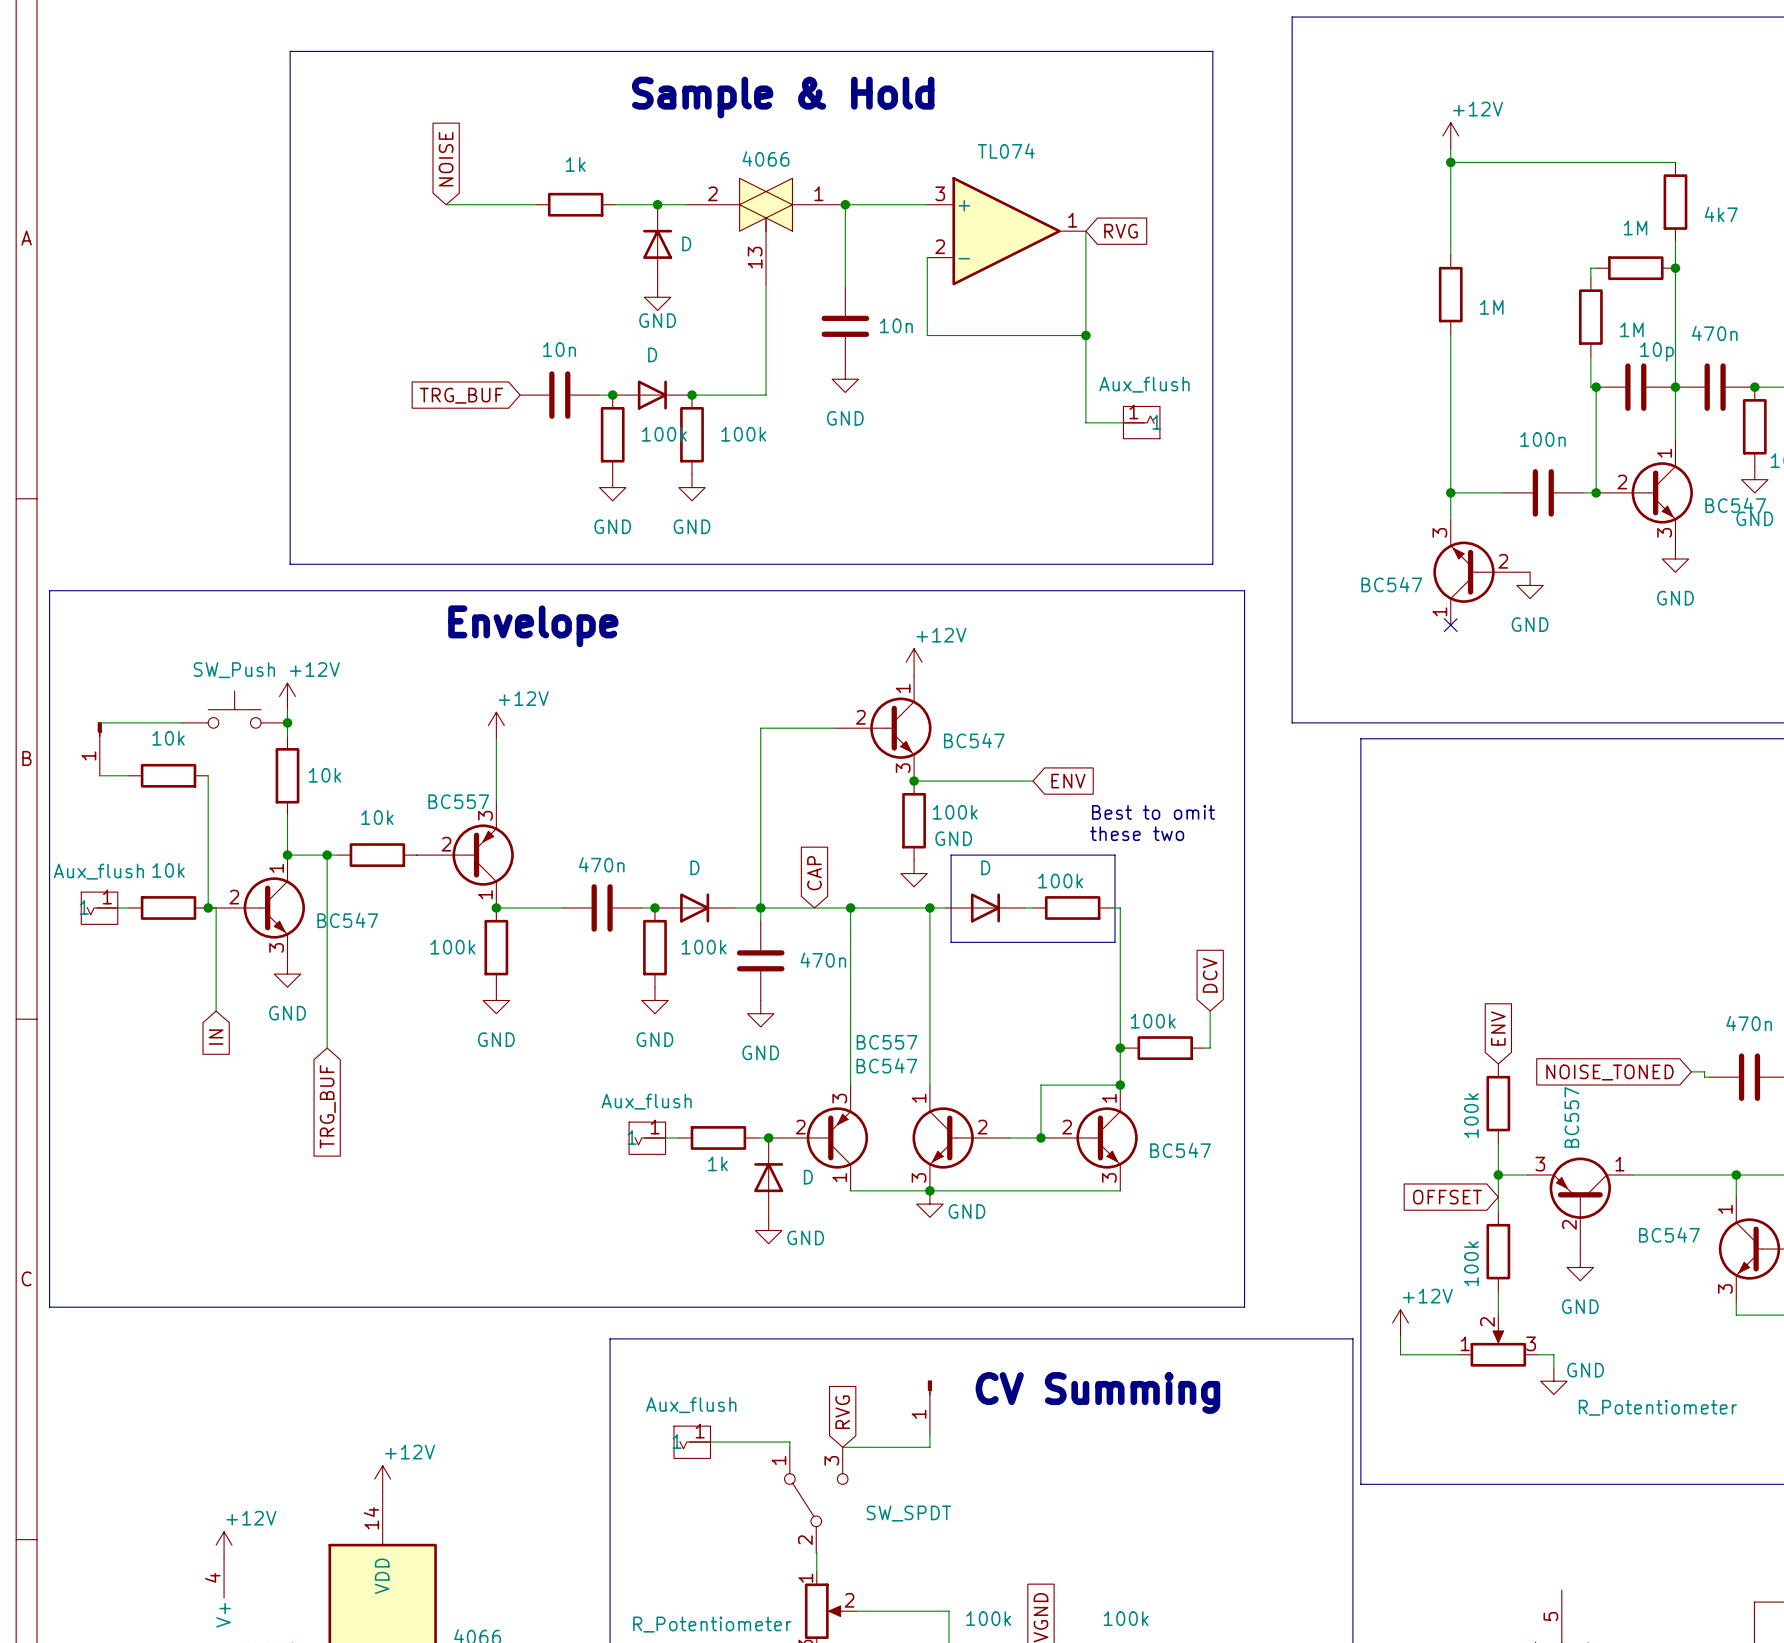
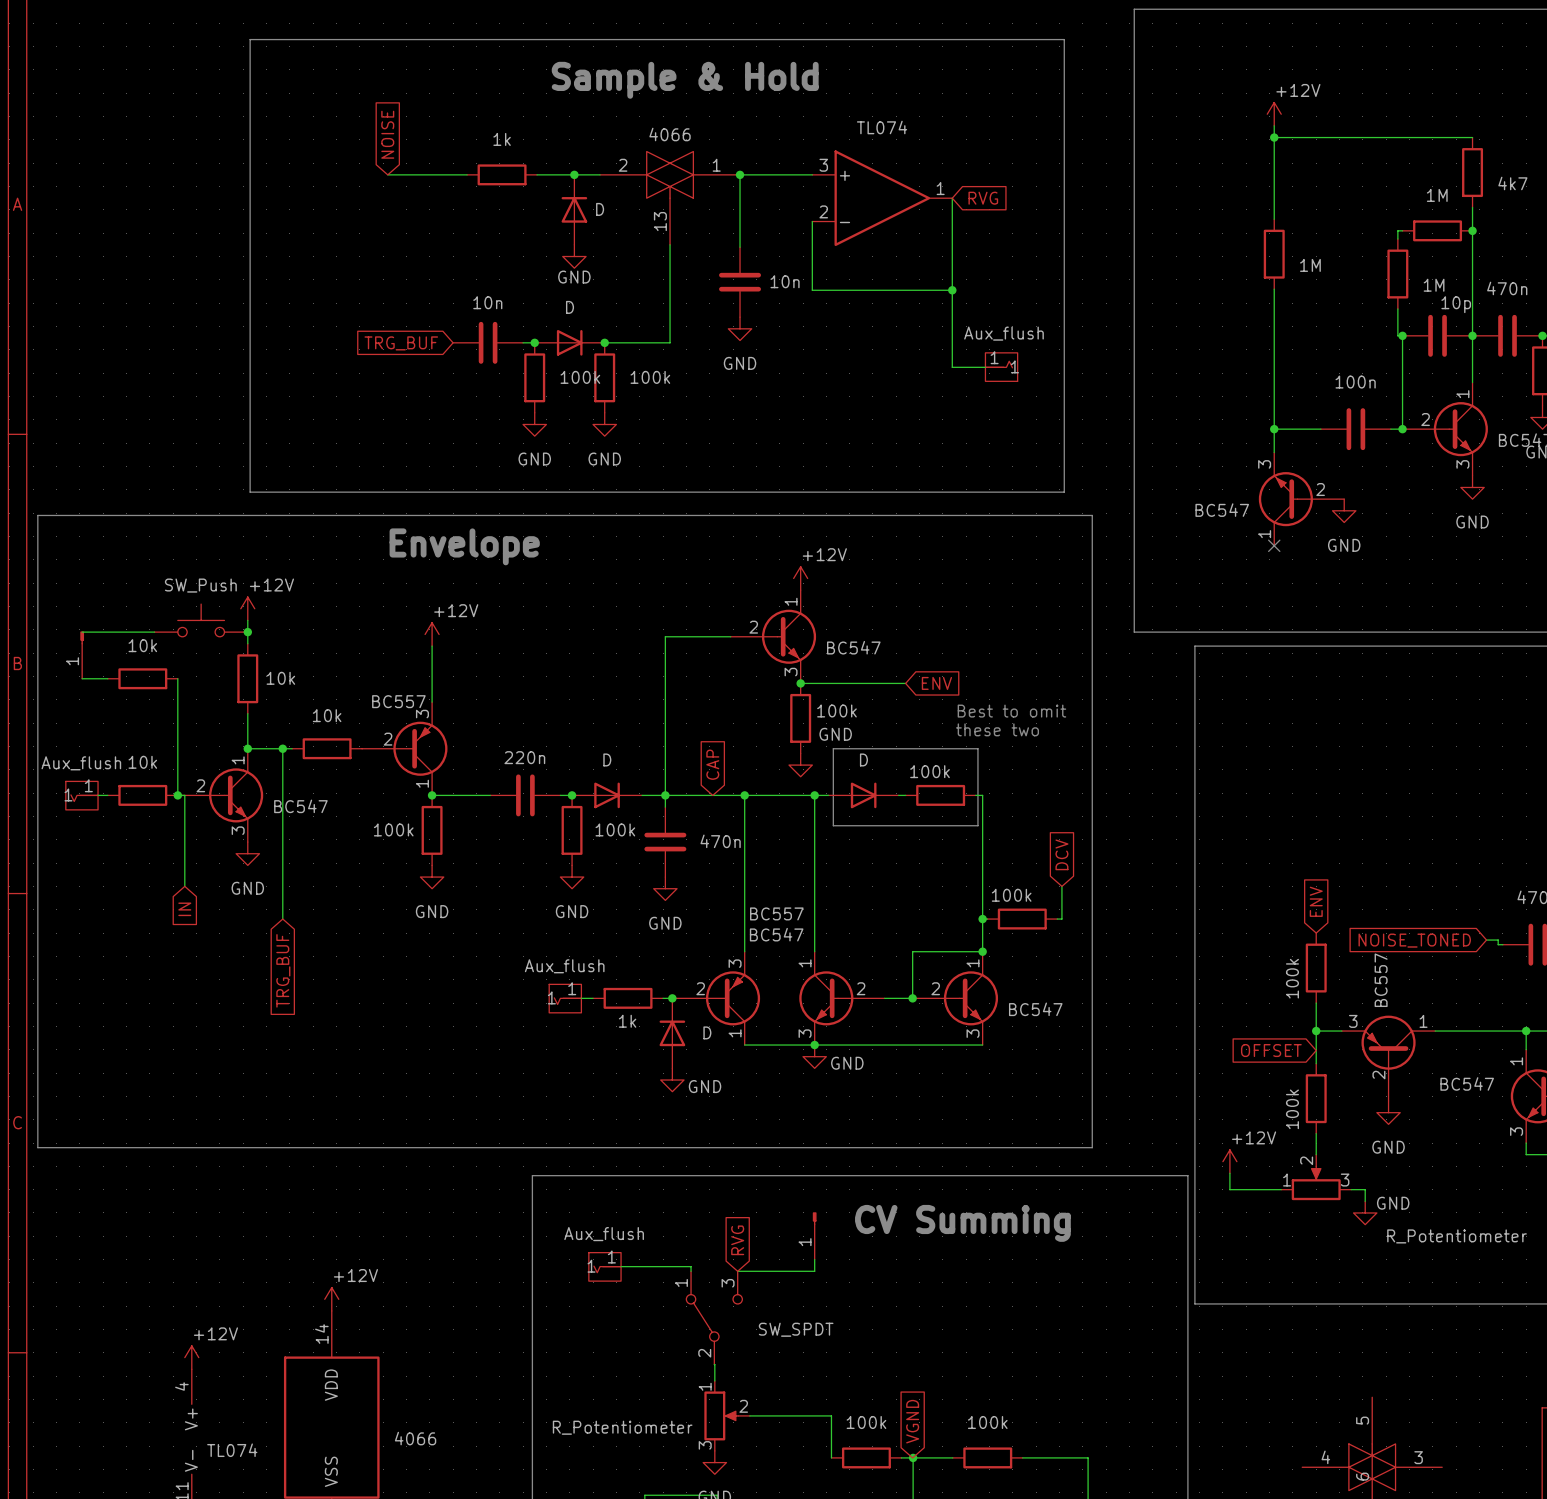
part value: 470n (601, 864) -> 220n (524, 757)

